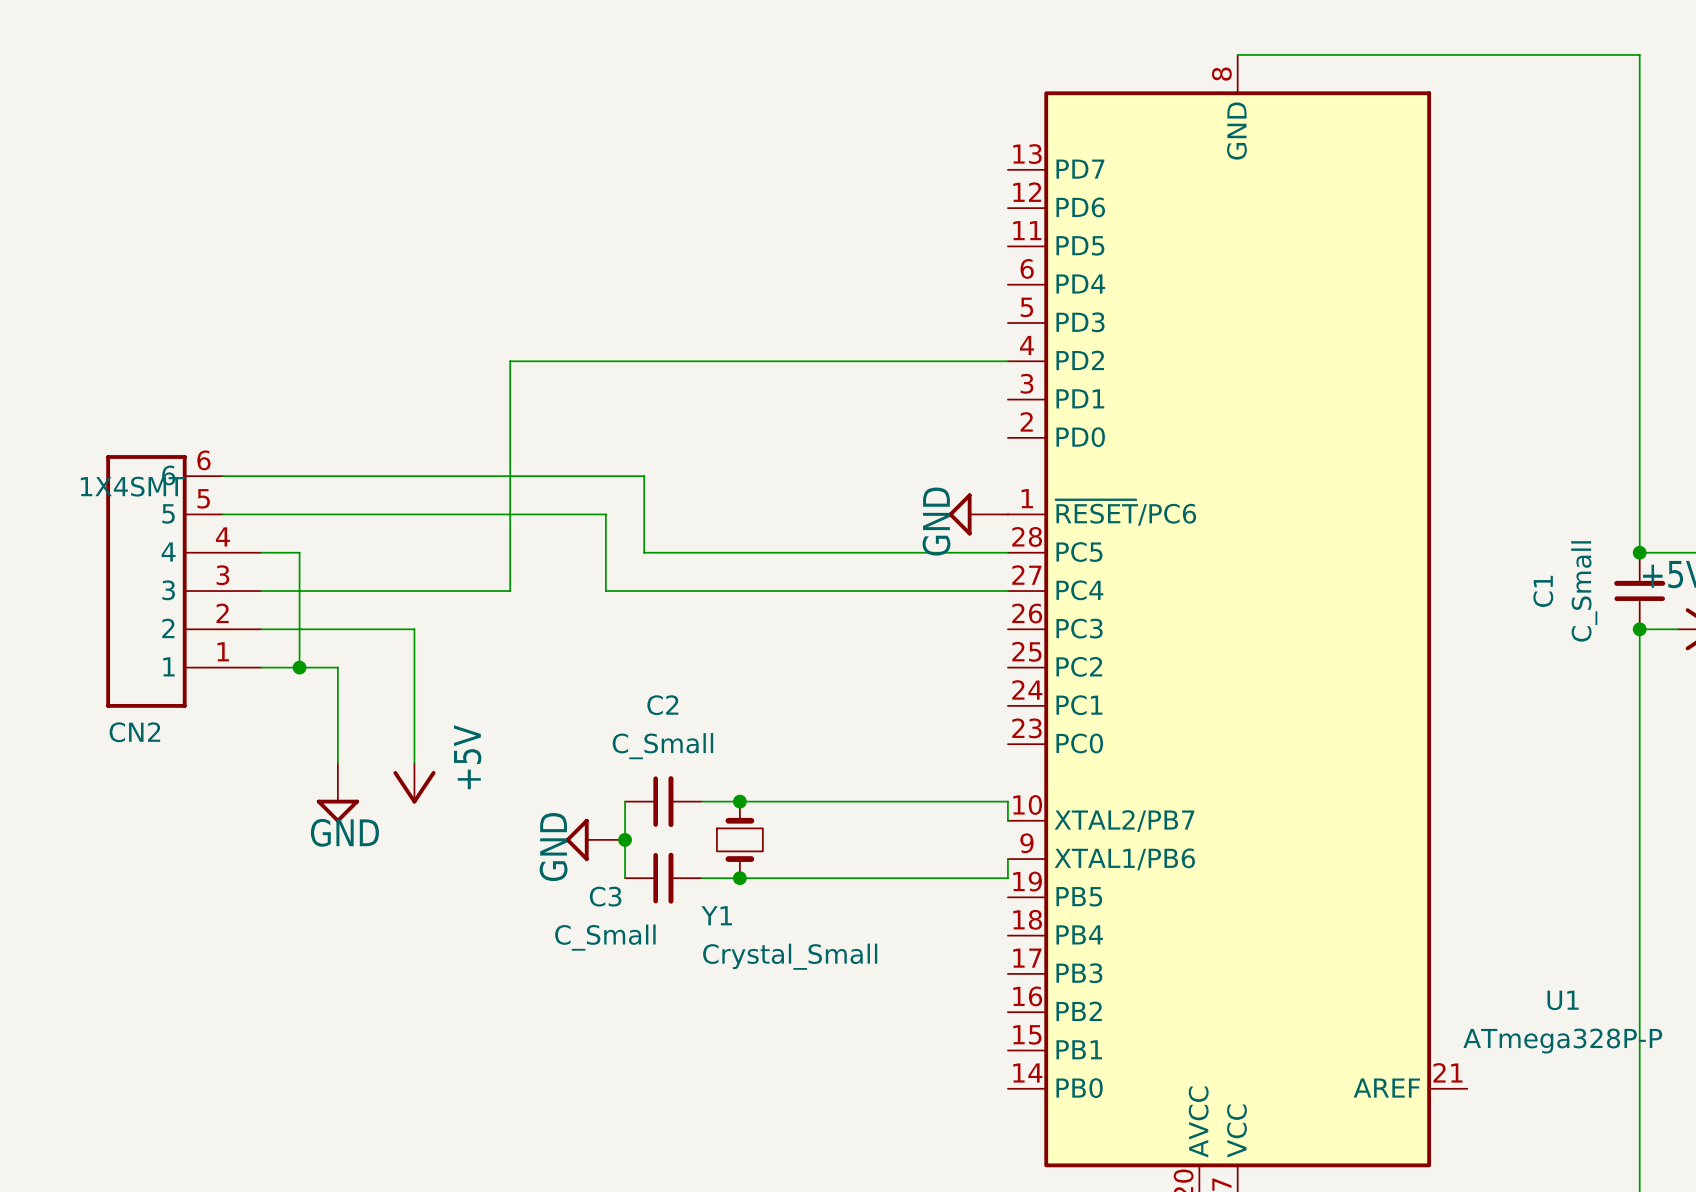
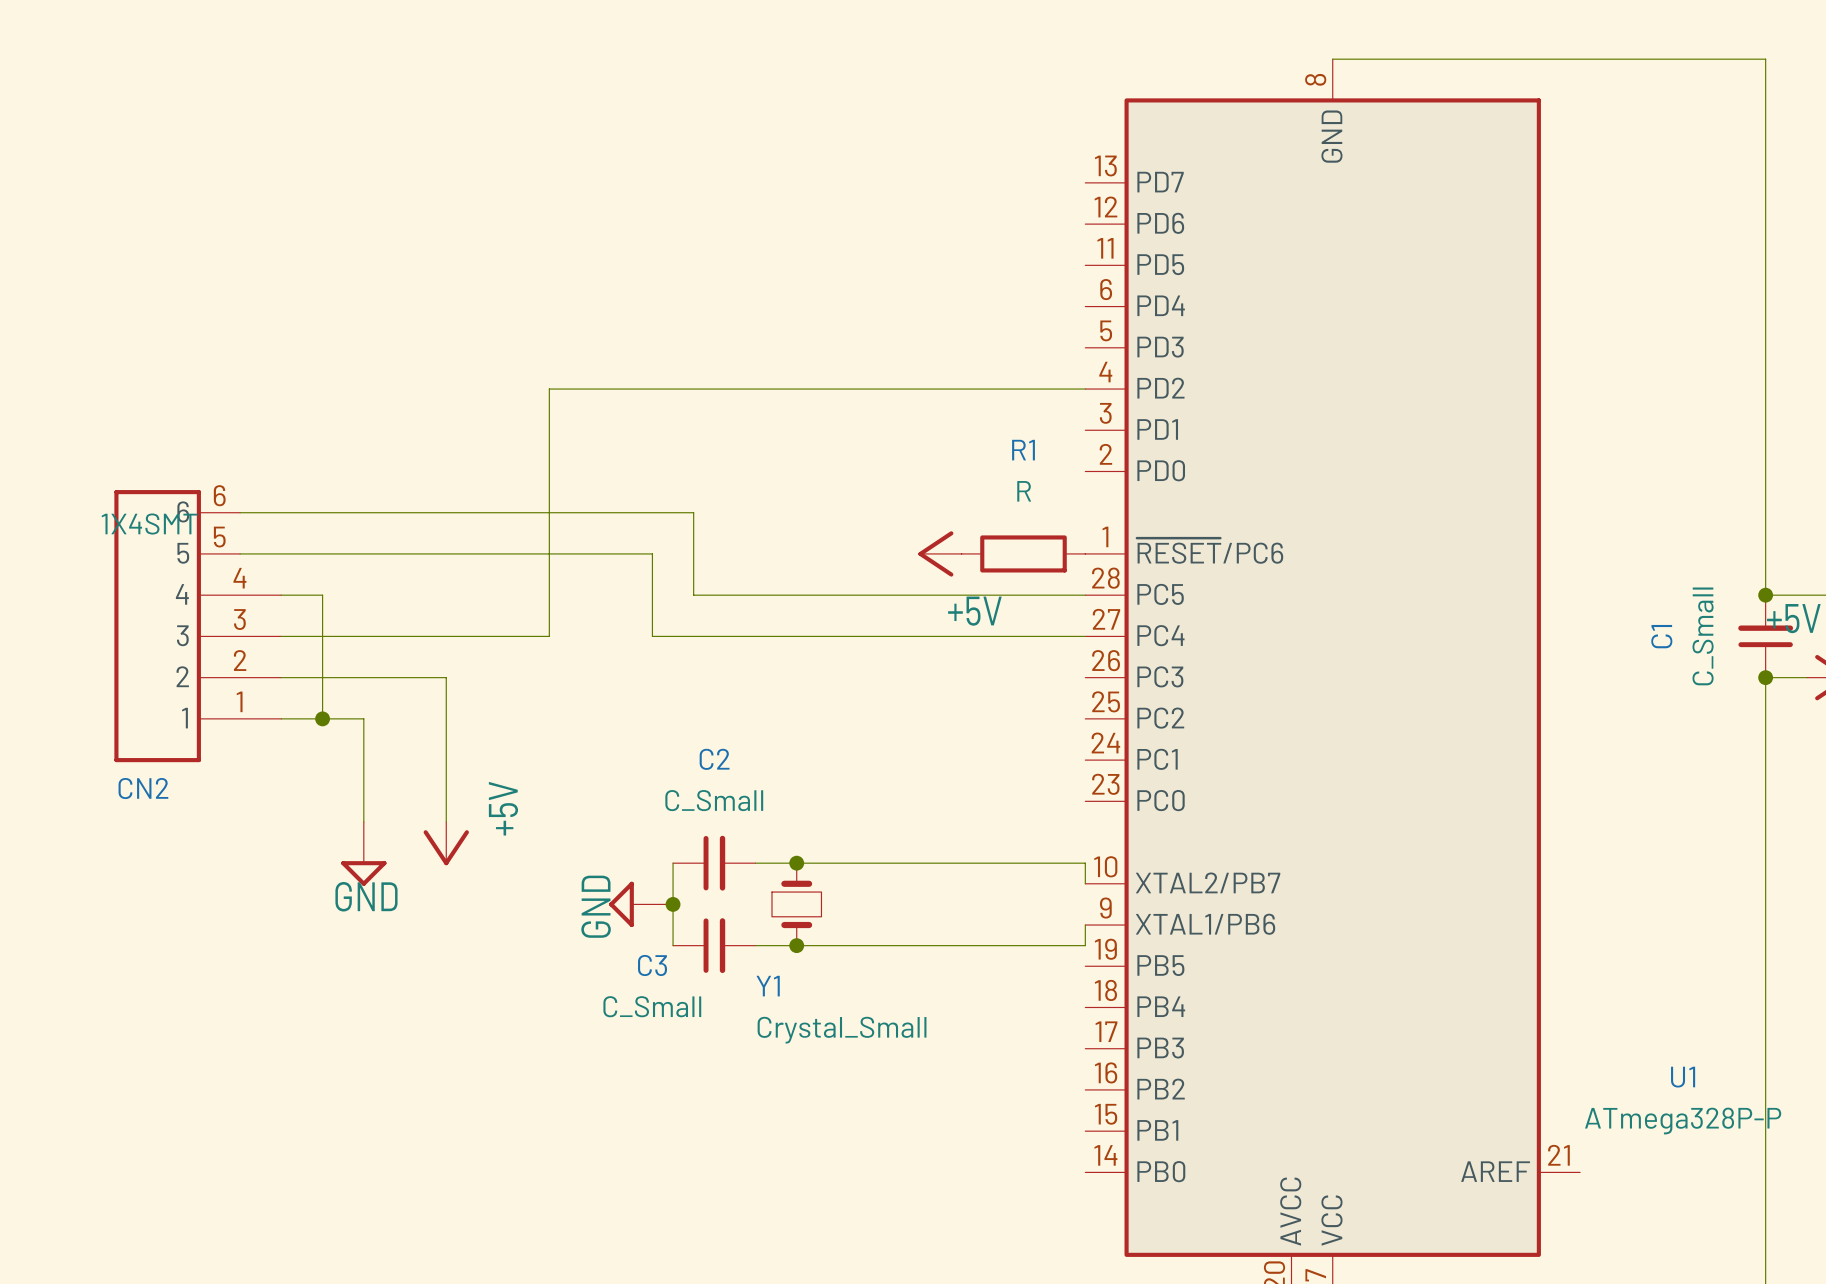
power symbol: none -> +5V (940, 553)
R1: none -> R (1023, 553)
power symbol: GND (978, 514) -> none

